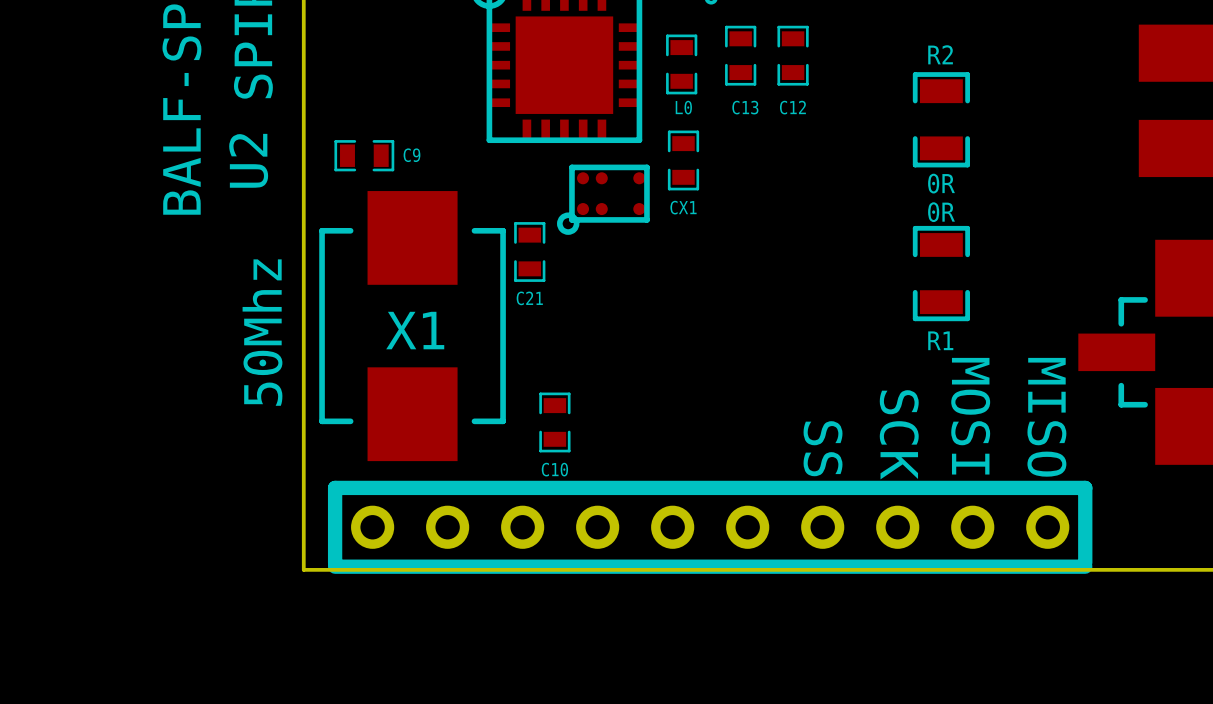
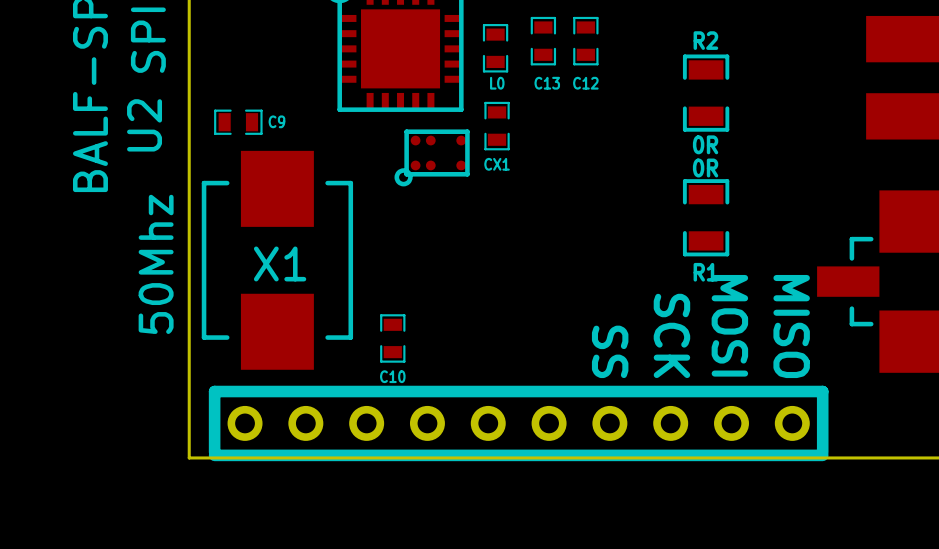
C21: (529, 251) -> none

